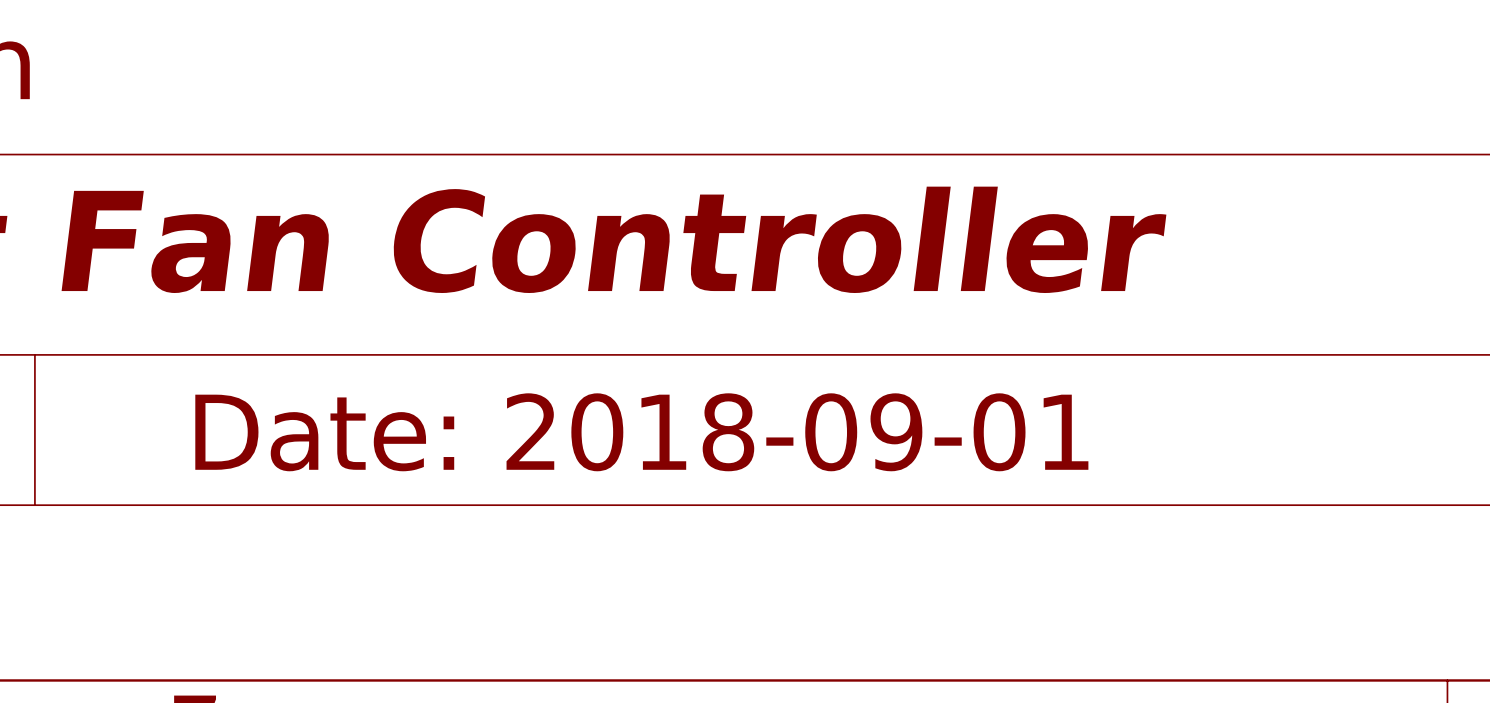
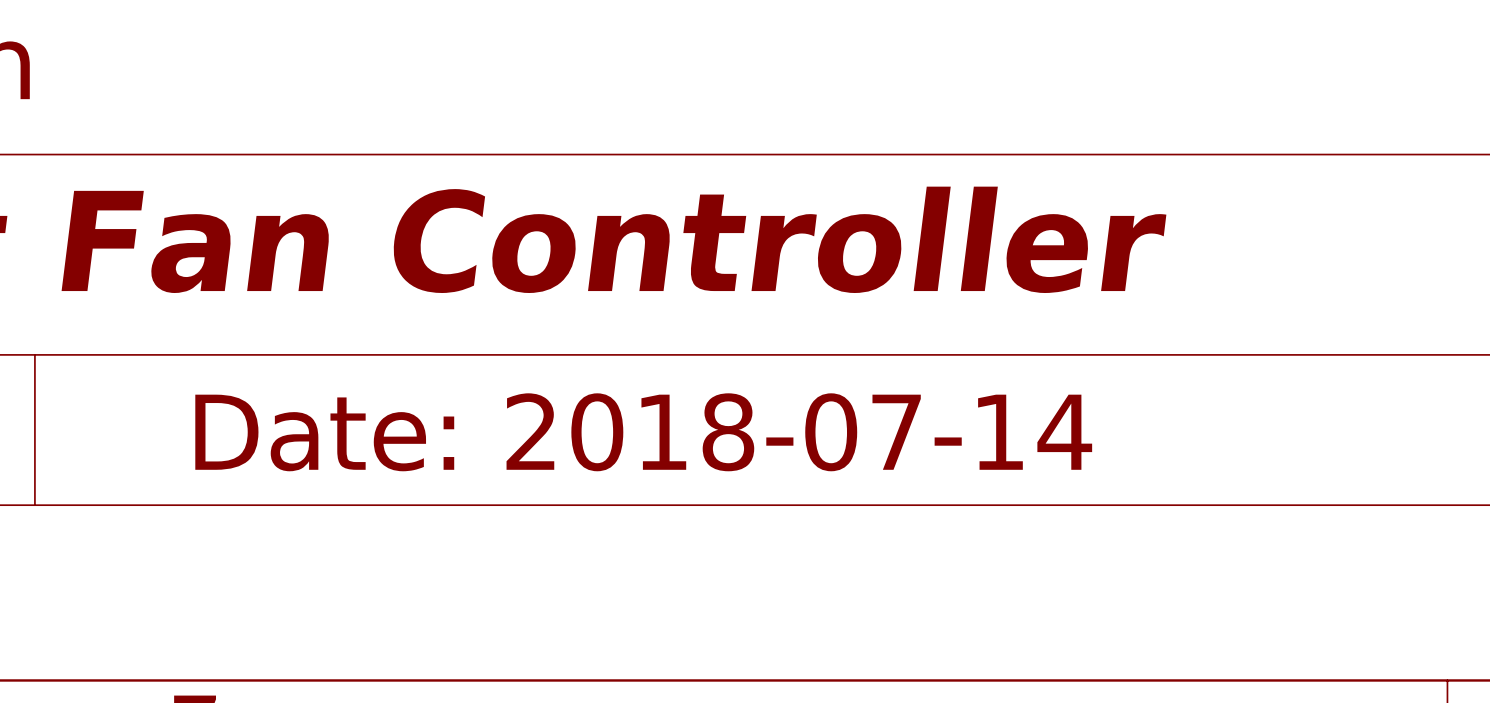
title block: Date: 2018-09-01 (641, 432) -> Date: 2018-07-14 (643, 432)

